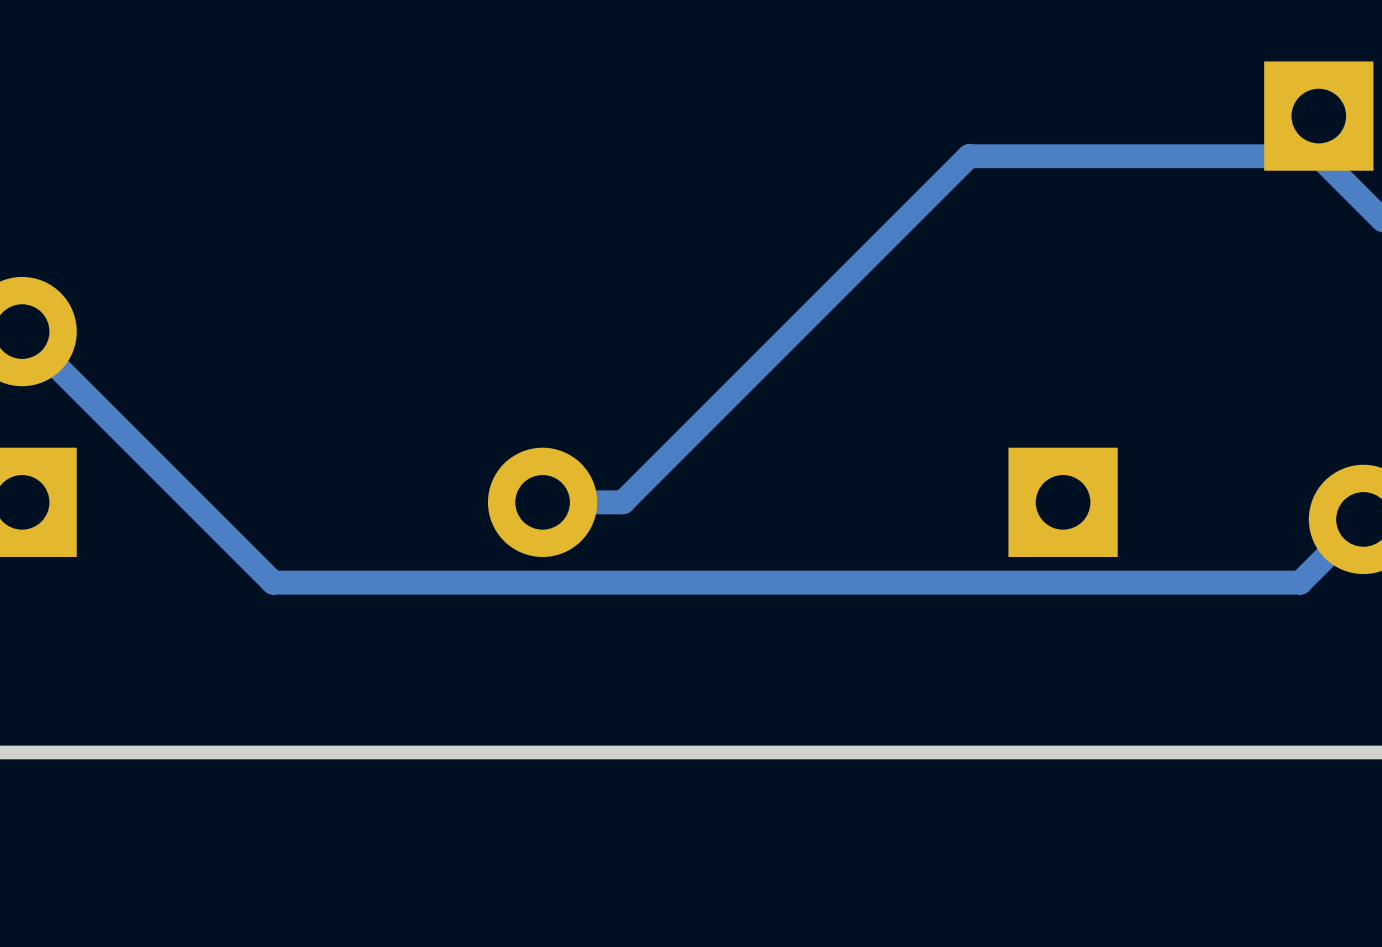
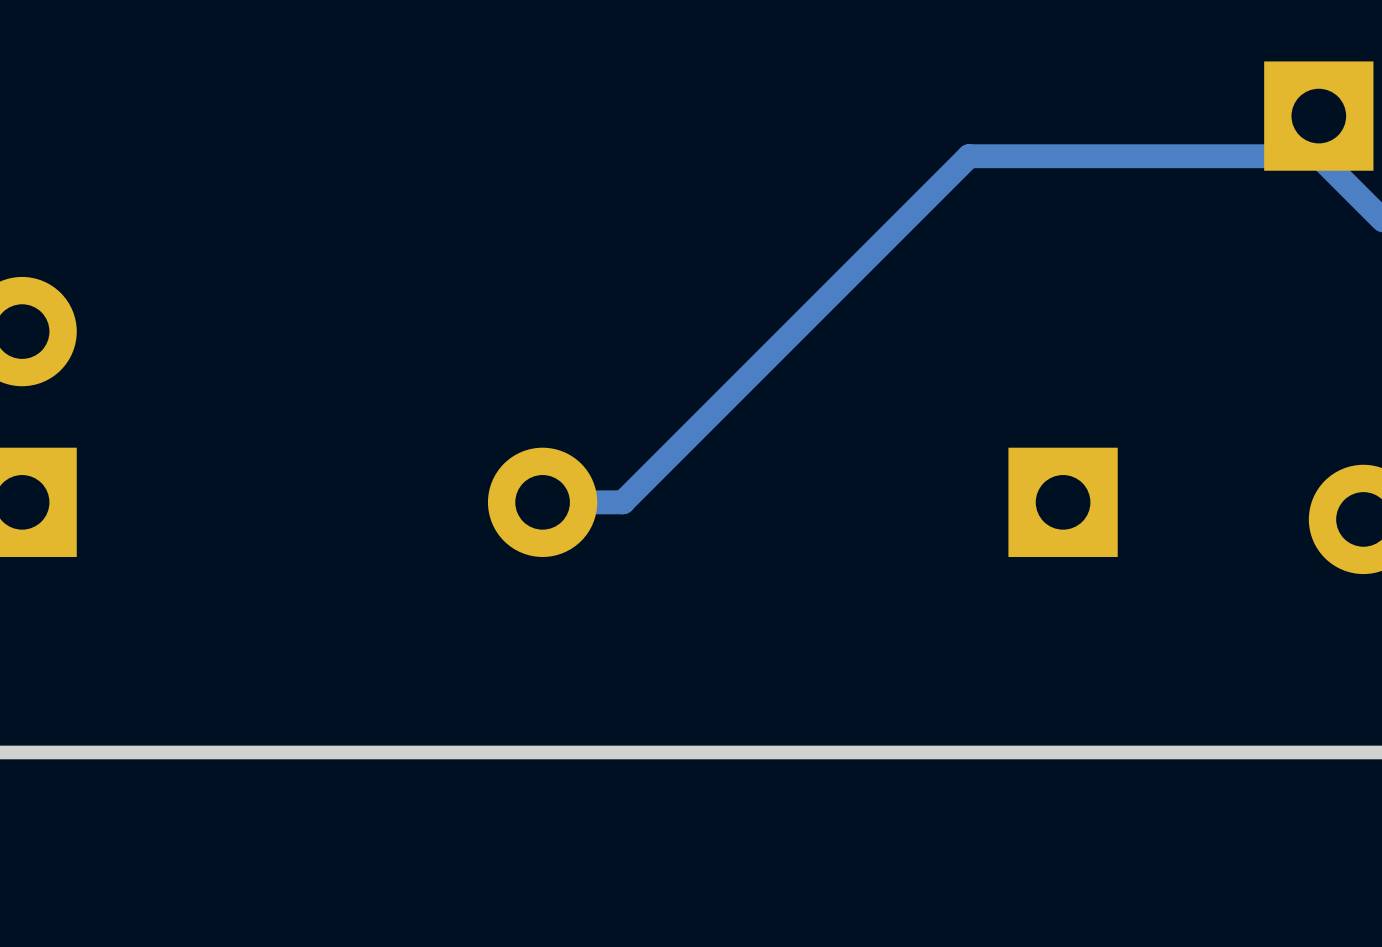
track: (22, 331) (273, 582) (1300, 582) (1363, 519) -> none

